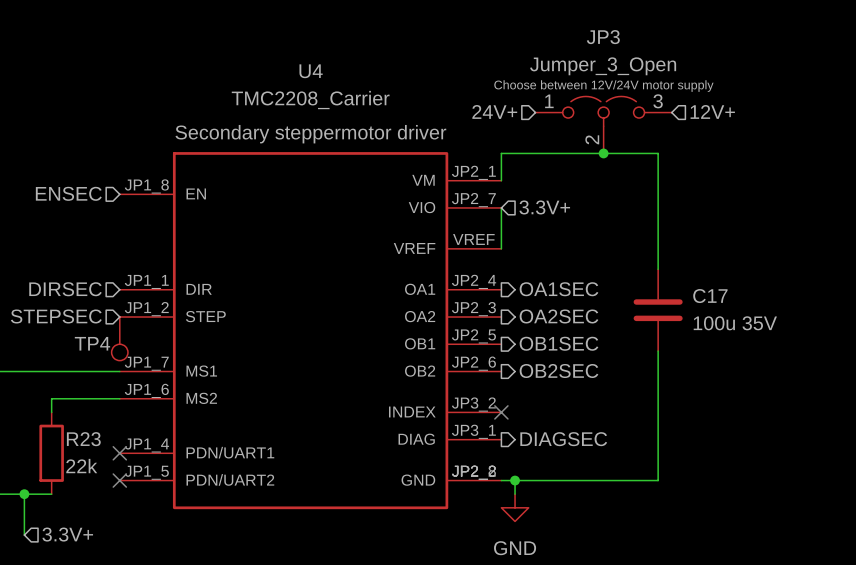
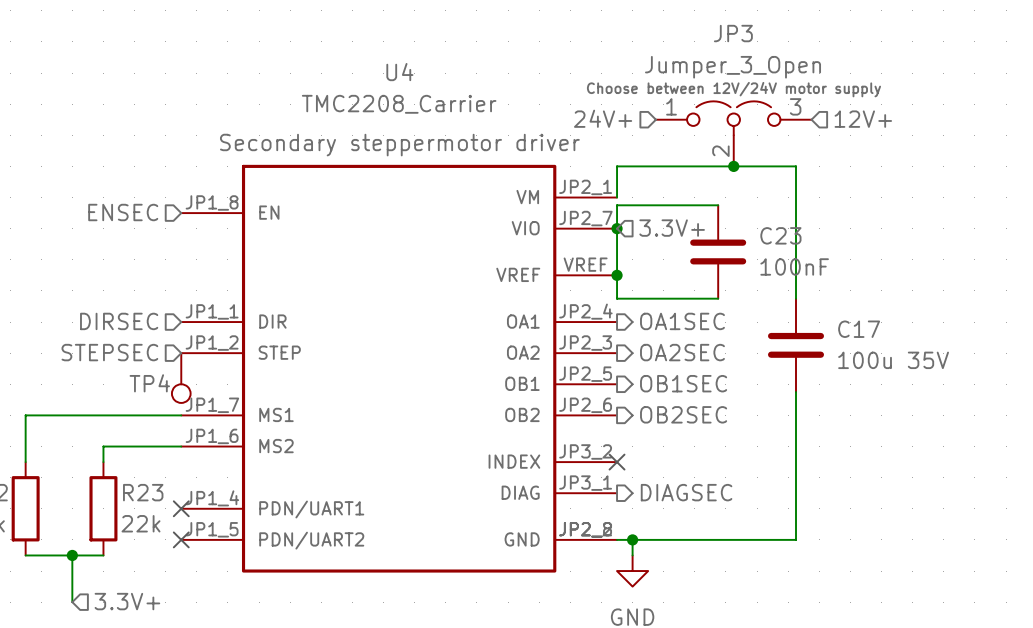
wire: none -> (718, 205) (617, 205) (617, 228)
junction: none -> (617, 228)
C23: none -> 100nF (718, 251)
wire: none -> (617, 275) (617, 298) (718, 298)
junction: none -> (617, 275)

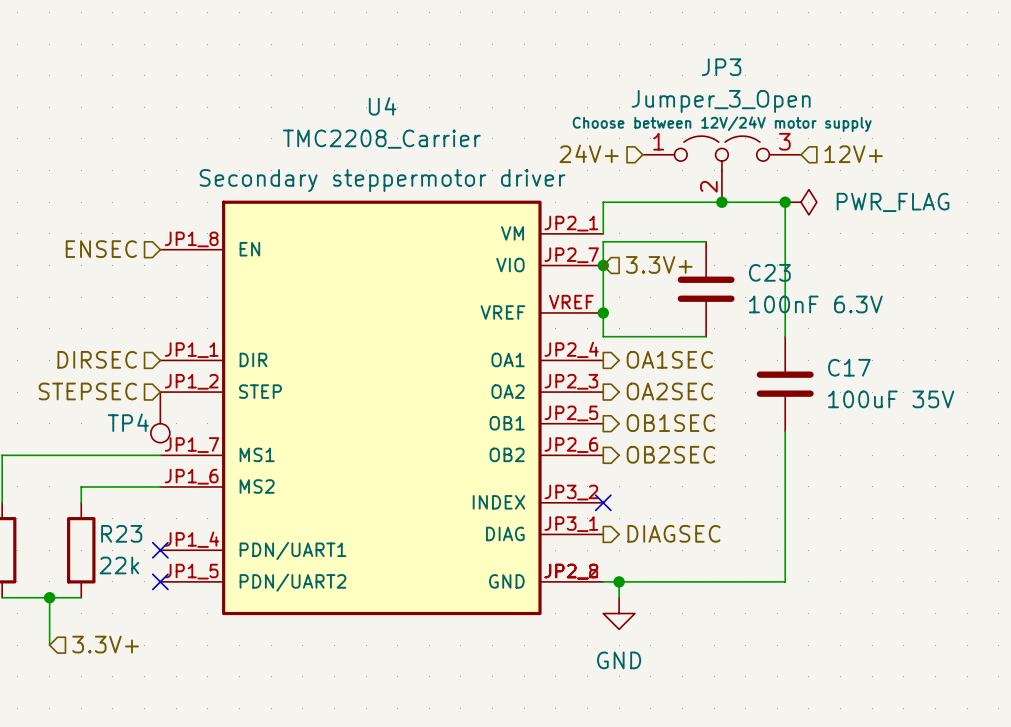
junction: none -> (785, 202)
power symbol: none -> PWR_FLAG (801, 202)
C23 value: 100nF (794, 266) -> 100nF 6.3V (815, 304)
C17 value: 100u 35V (893, 360) -> 100uF 35V (891, 399)

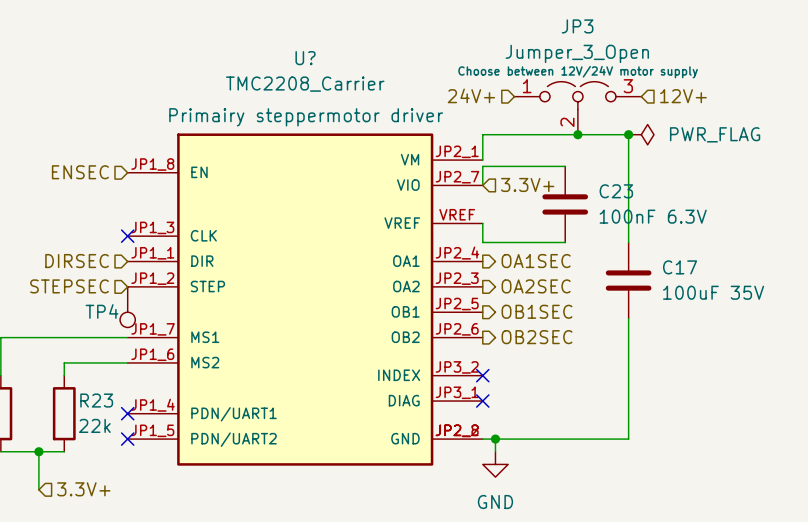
wire: (603, 265) (603, 312) -> none
junction: (603, 265) -> none
junction: (603, 312) -> none
no-connect mark: none -> (127, 236)
U4: TMC2208_Carrier (381, 407) -> none
U?: none -> TMC2208_Carrier (305, 299)
hierarchical label: DIAGSEC (673, 533) -> none
no-connect mark: none -> (482, 401)

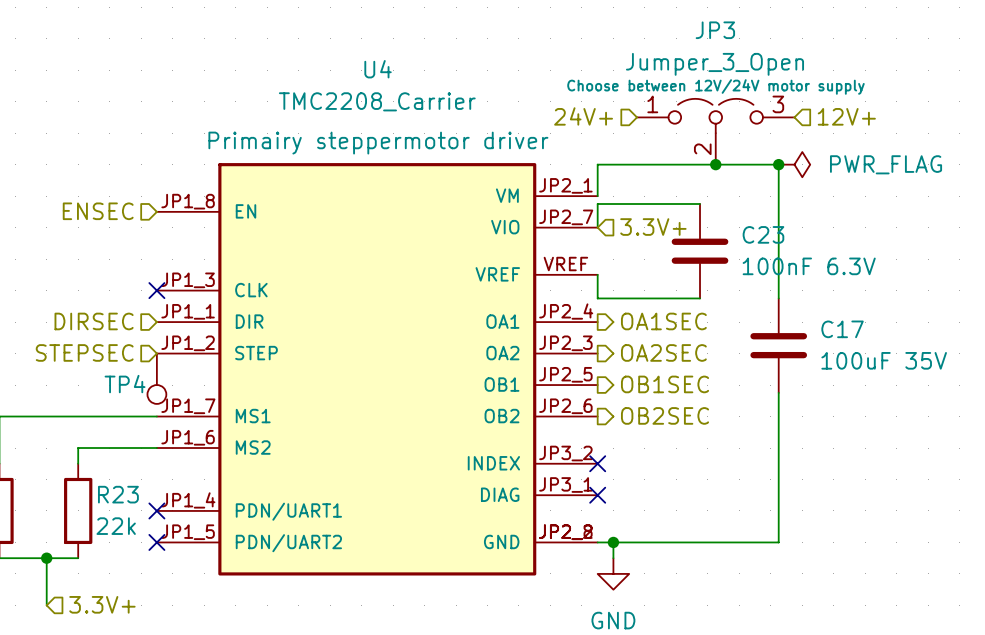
U? name: U? (305, 58) -> U4 (378, 69)

